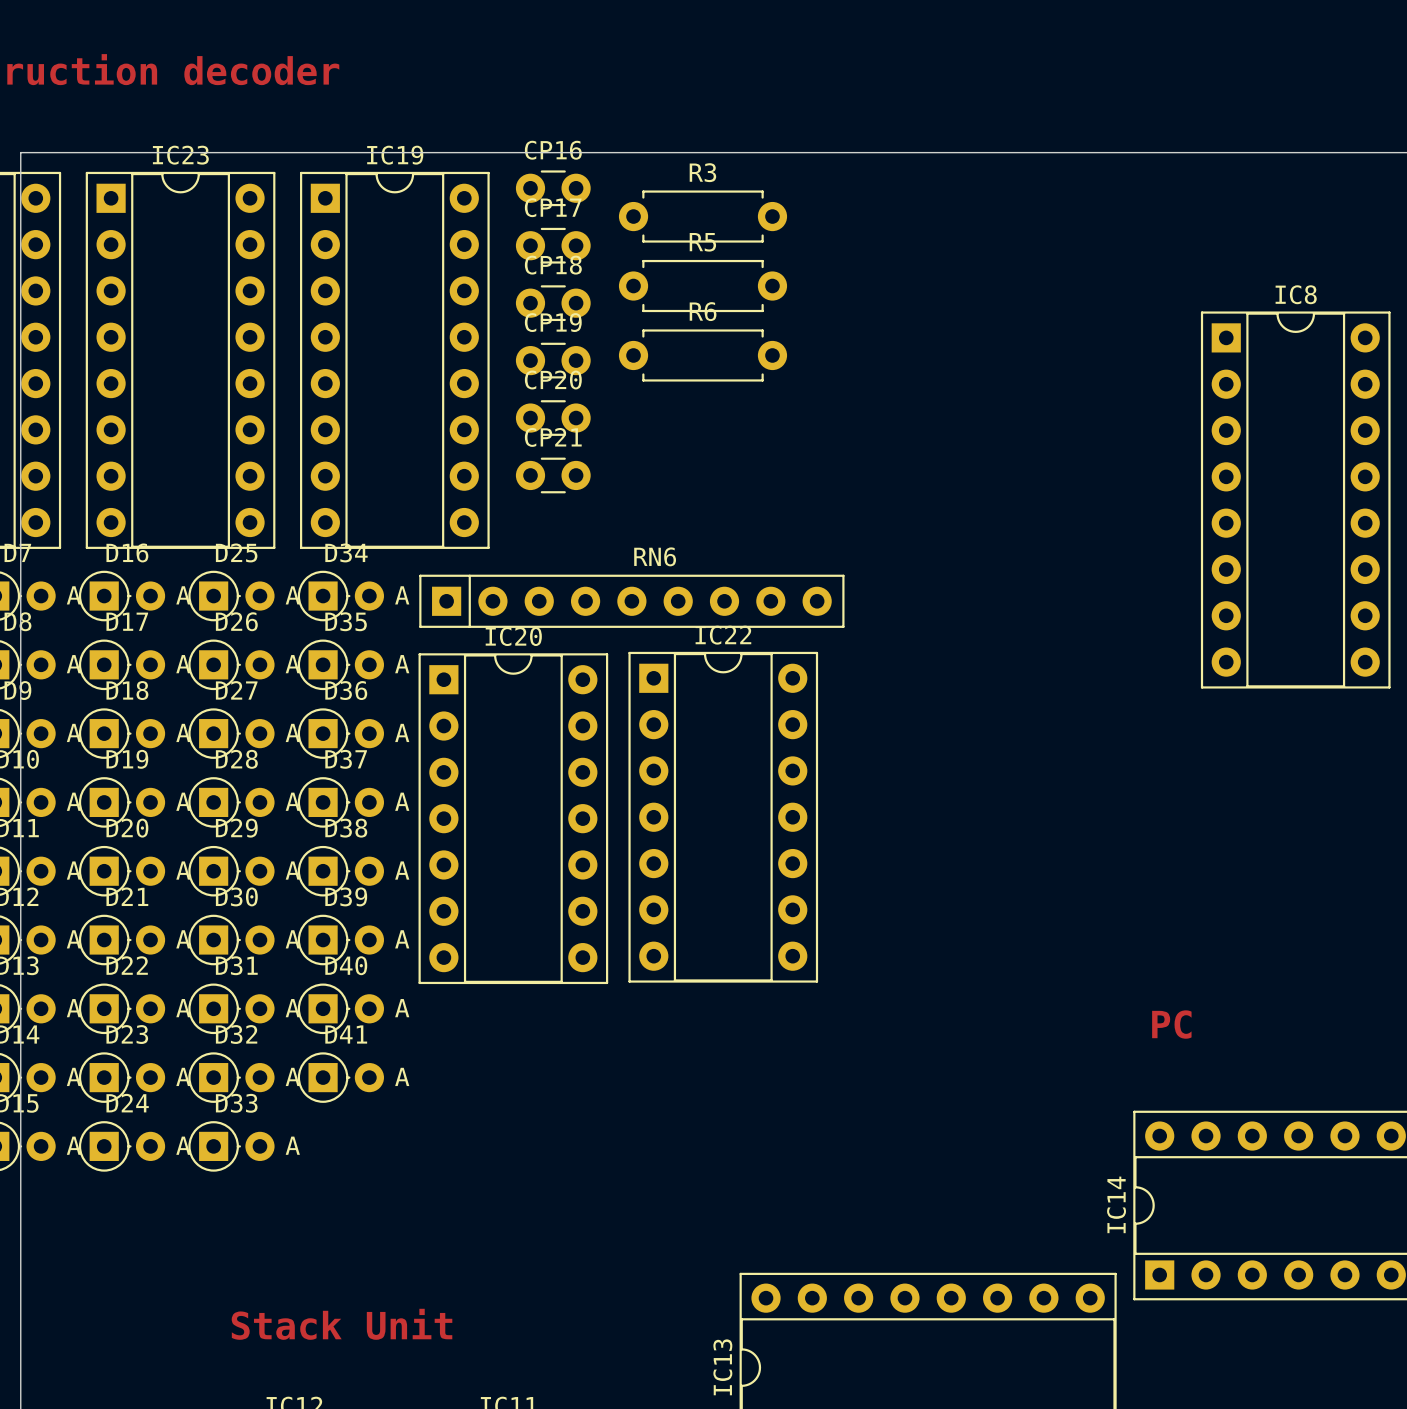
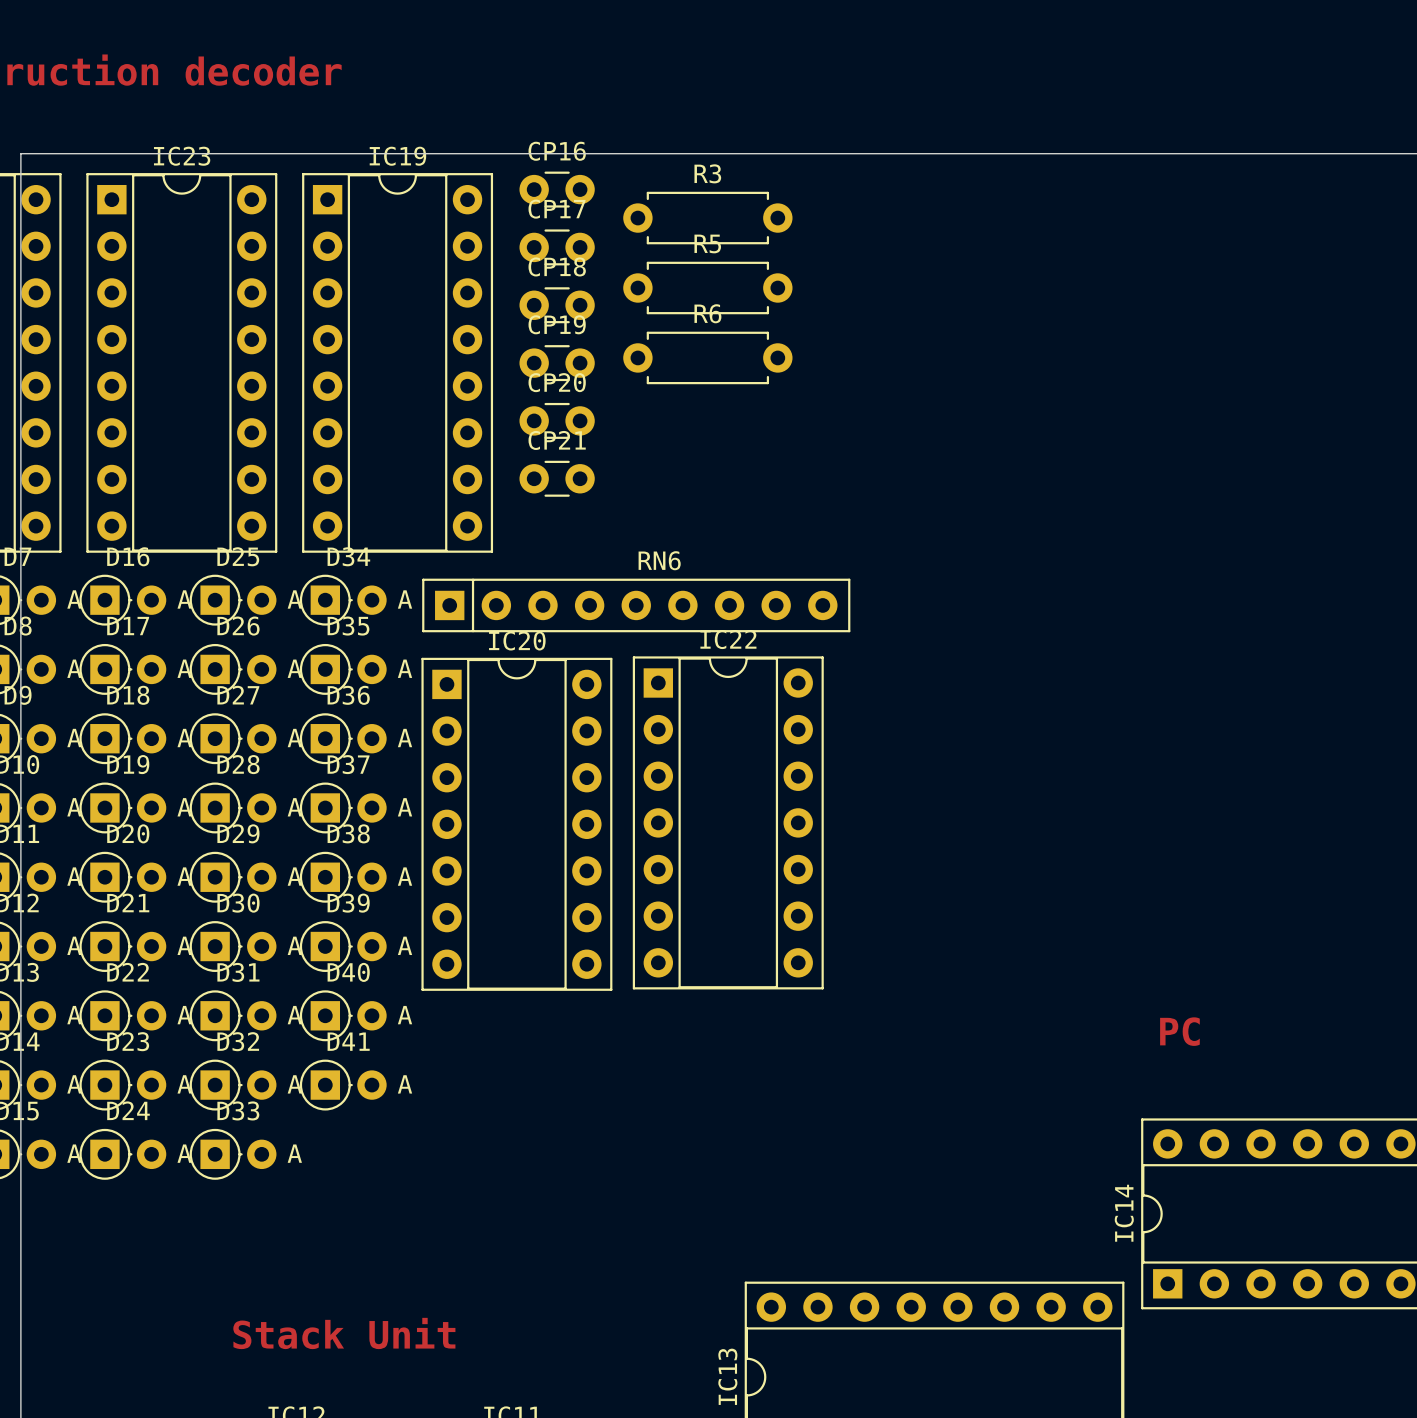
IC8: (1295, 500) -> none

